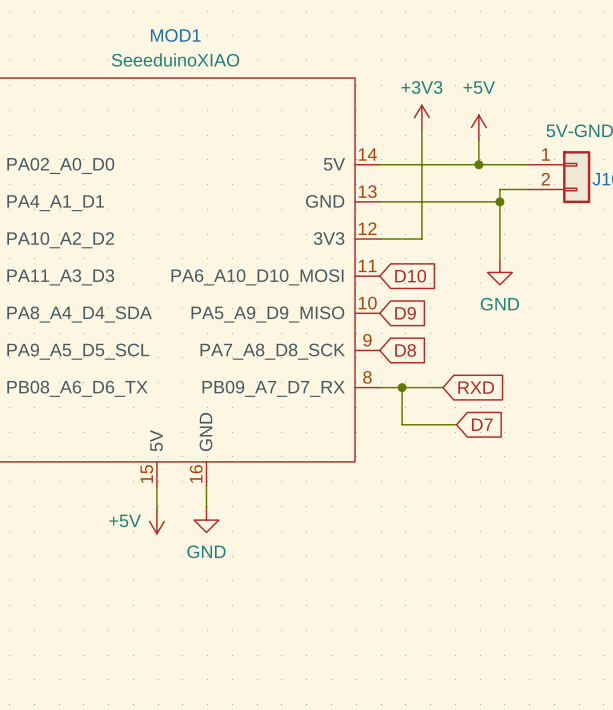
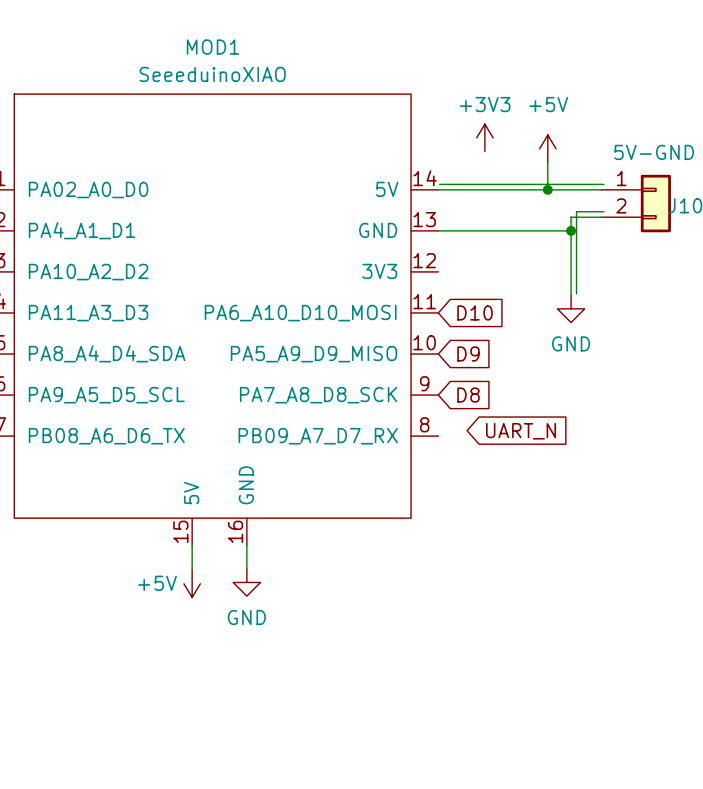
wire: (421, 130) (421, 239) (379, 239) -> none
wire: none -> (439, 184) (603, 184)
wire: none -> (603, 211) (576, 211) (576, 293)
global label: none -> UART_N (521, 431)
wire: (379, 387) (442, 387) -> none
wire: (402, 387) (402, 424) (456, 424) -> none
junction: (402, 387) -> none
global label: RXD (476, 387) -> none
global label: D7 (482, 424) -> none

